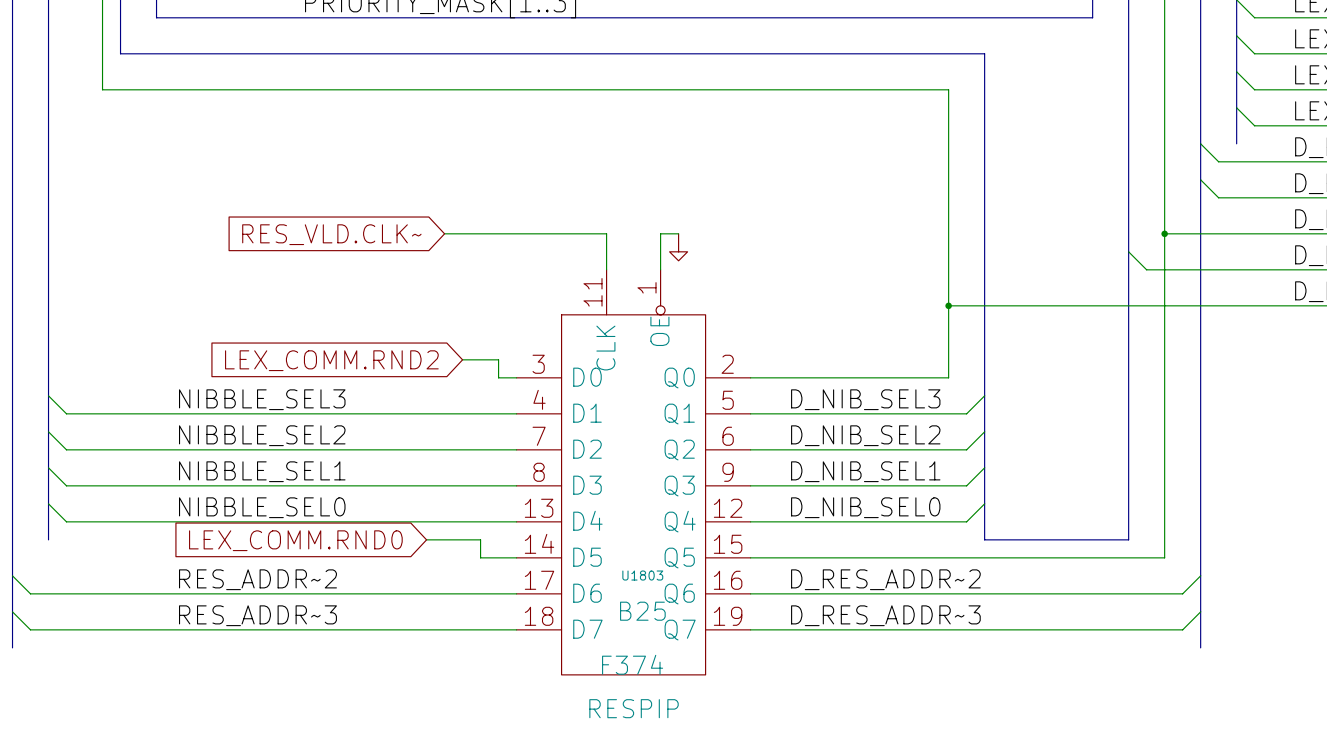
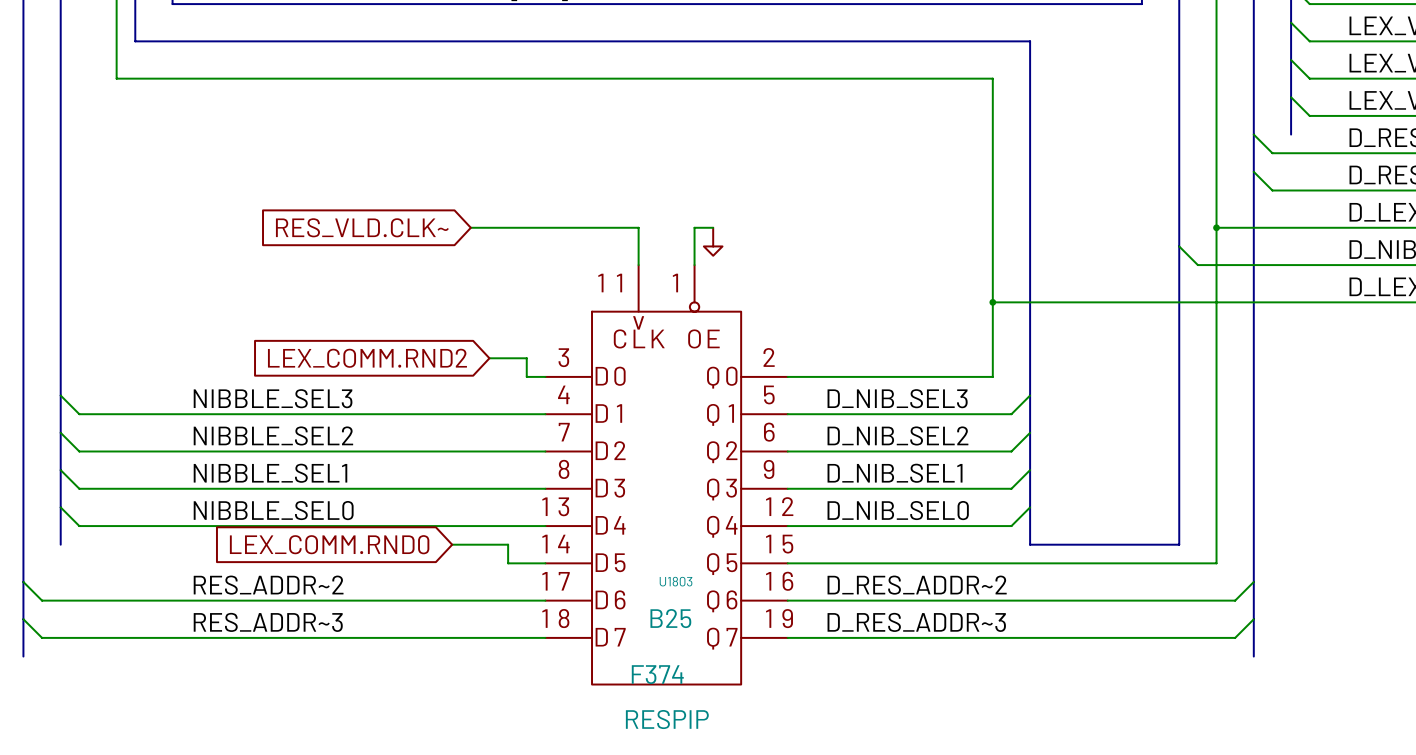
U1803 symbol: [516, 269, 751, 675] -> [545, 265, 788, 685]

